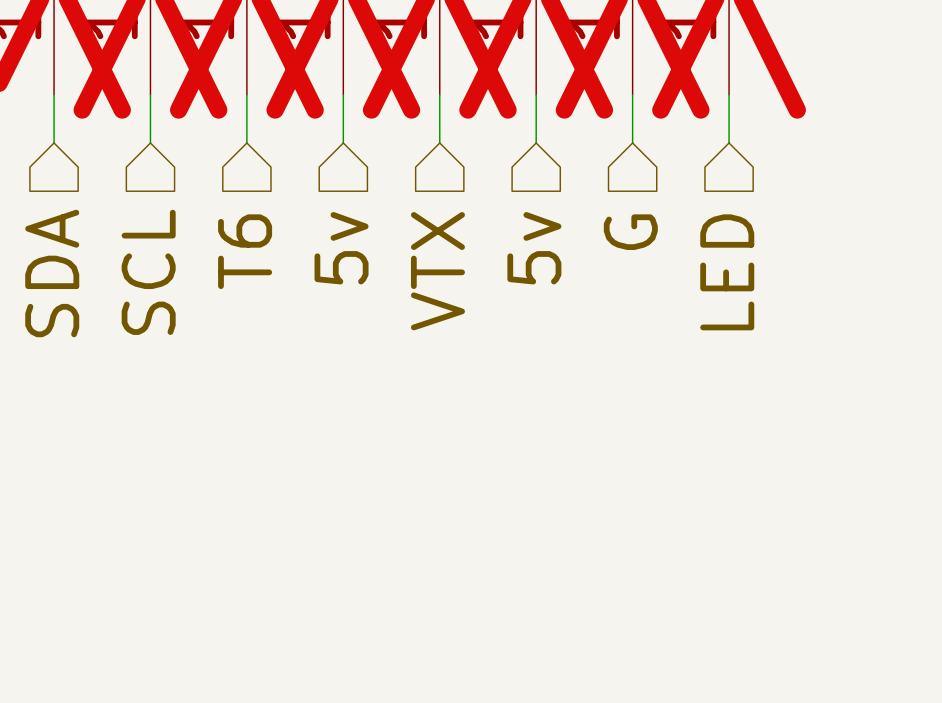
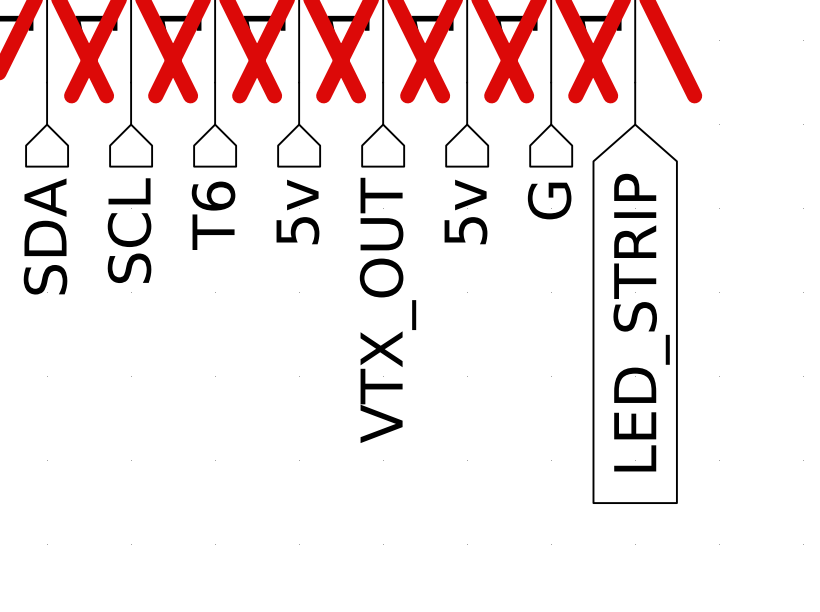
hierarchical label: VTX (437, 271) -> VTX_OUT (387, 310)
hierarchical label: LED (727, 272) -> none
global label: none -> LED_STRIP (641, 322)

